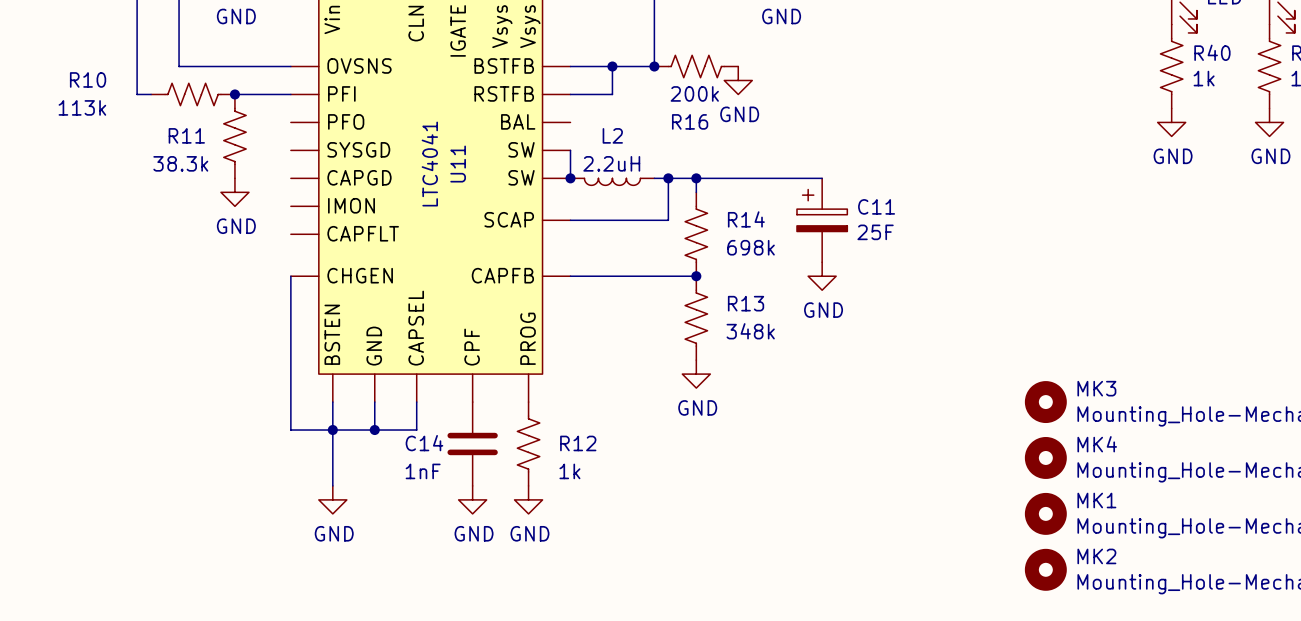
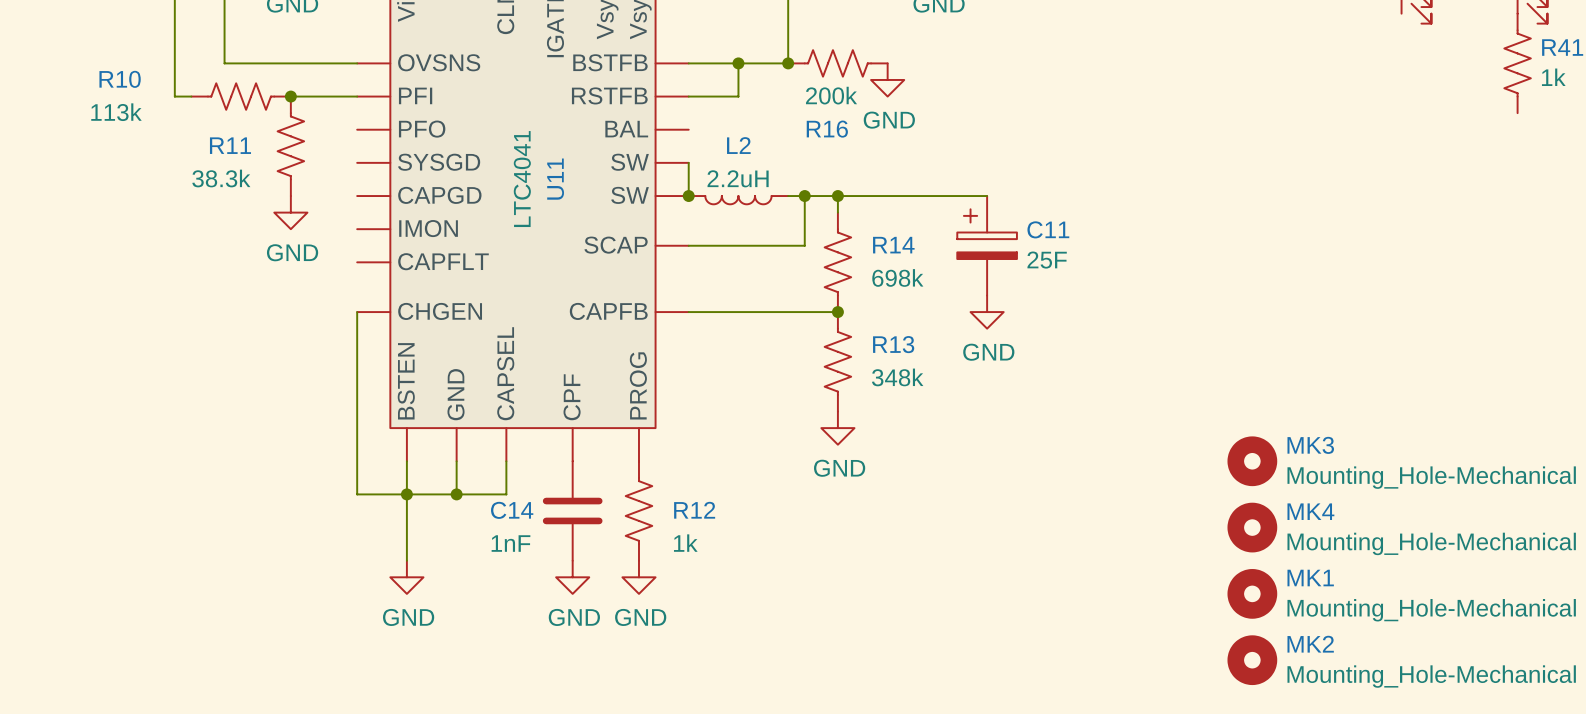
R40: 1k (1171, 66) -> none
power symbol: GND (1171, 122) -> none
power symbol: GND (1269, 122) -> none

